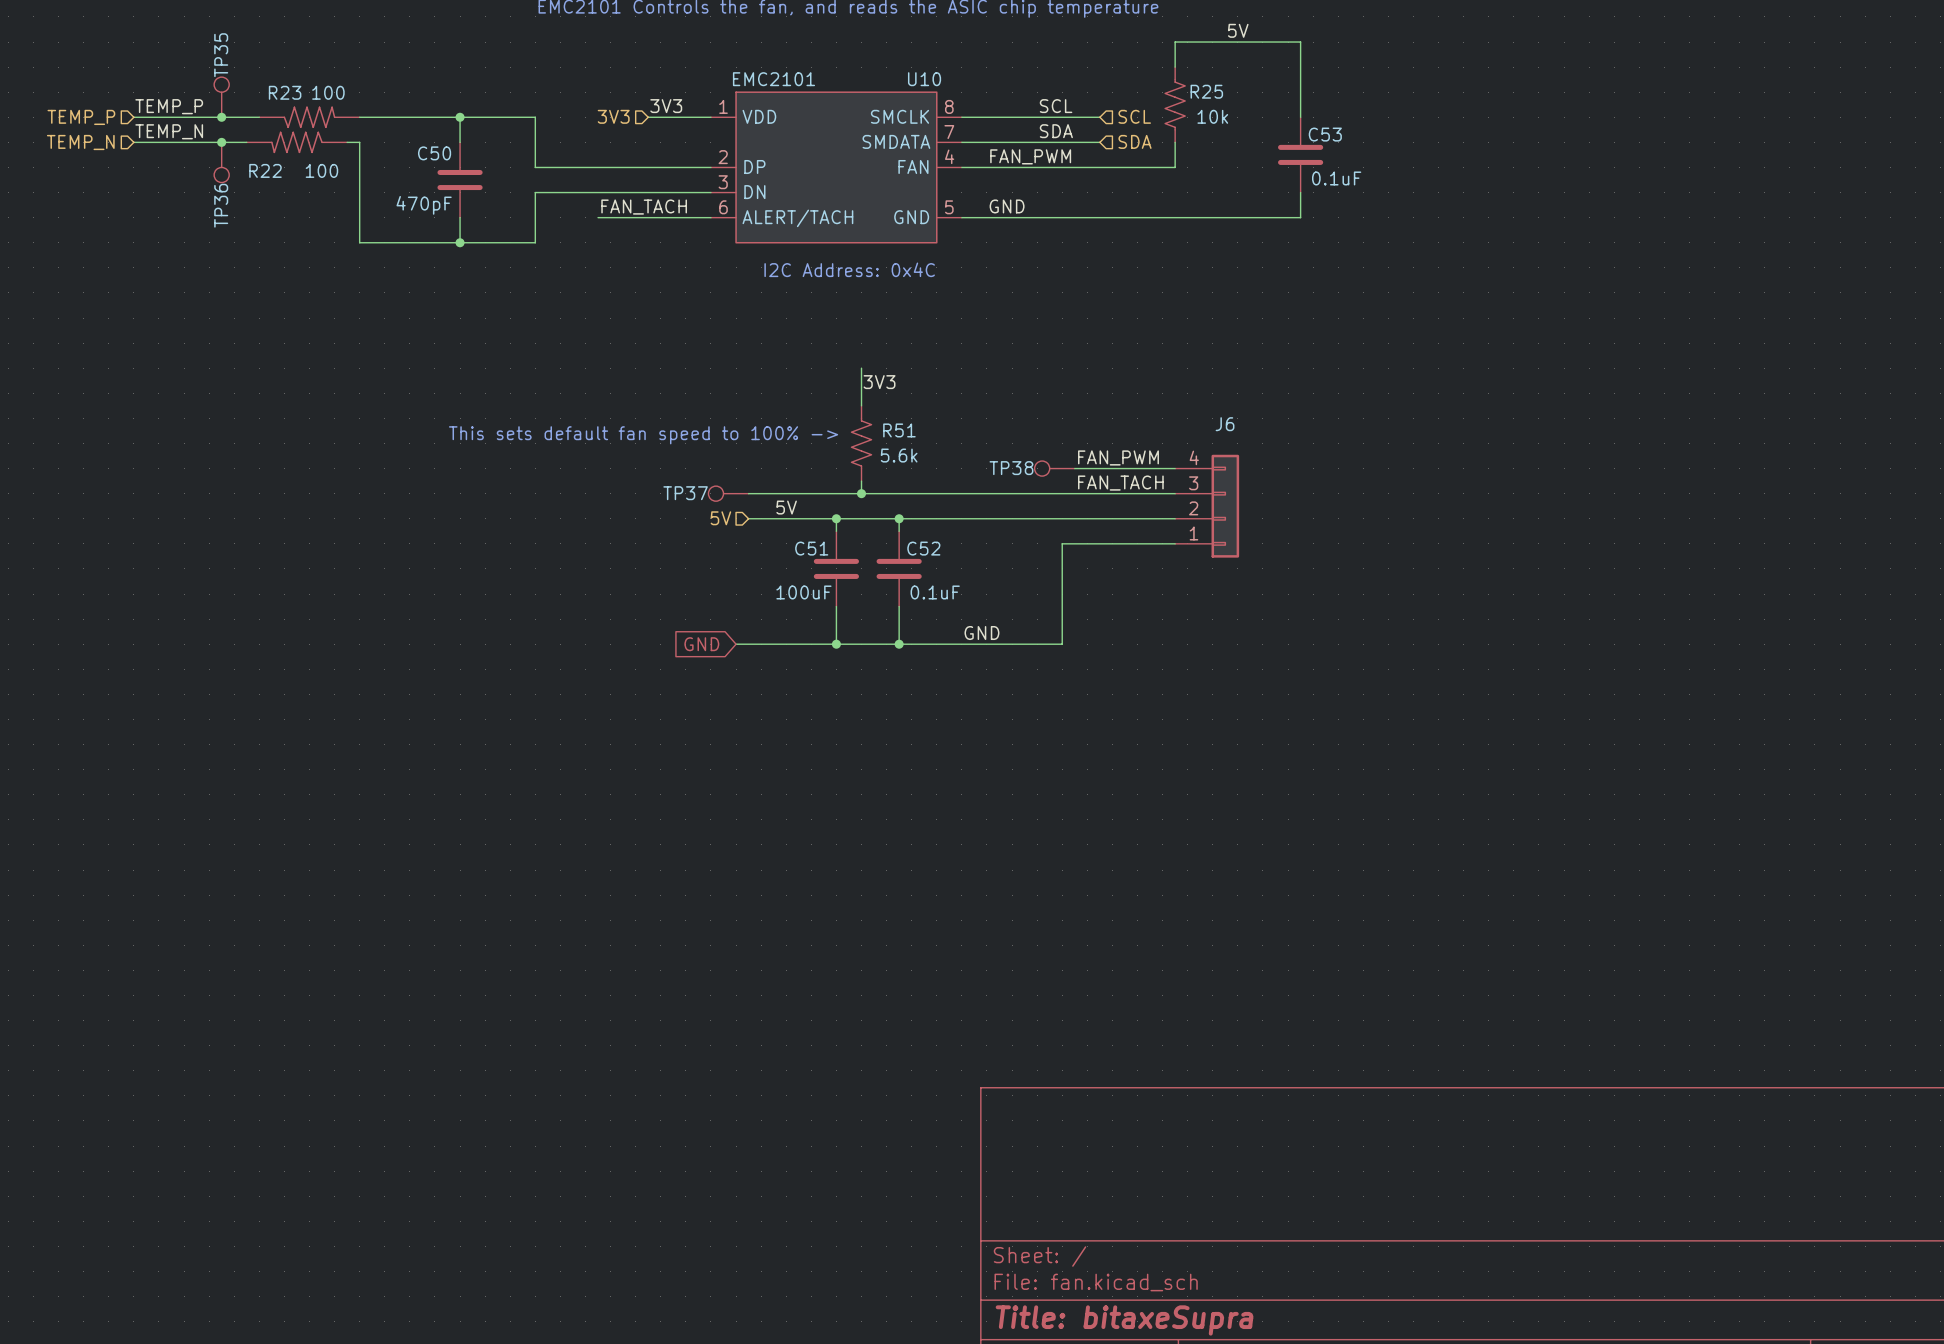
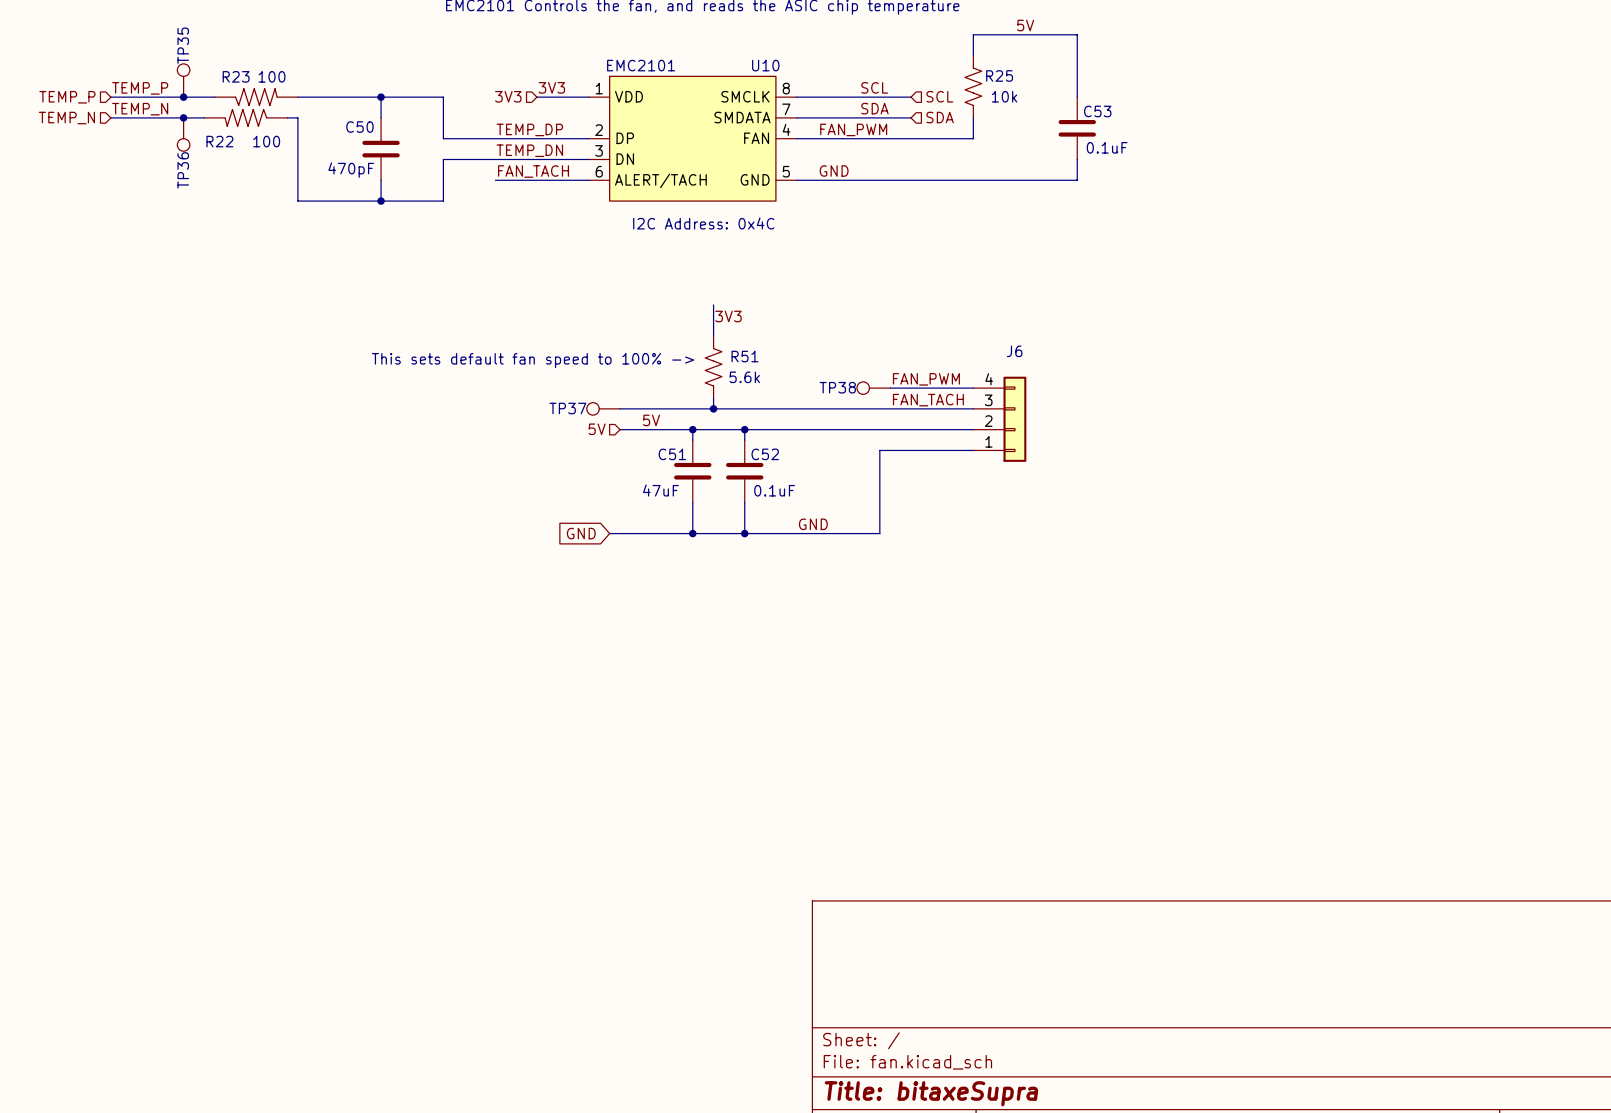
label: none -> TEMP_DP (529, 129)
label: none -> TEMP_DN (529, 150)
C51 value: 100uF (803, 592) -> 47uF (660, 490)

